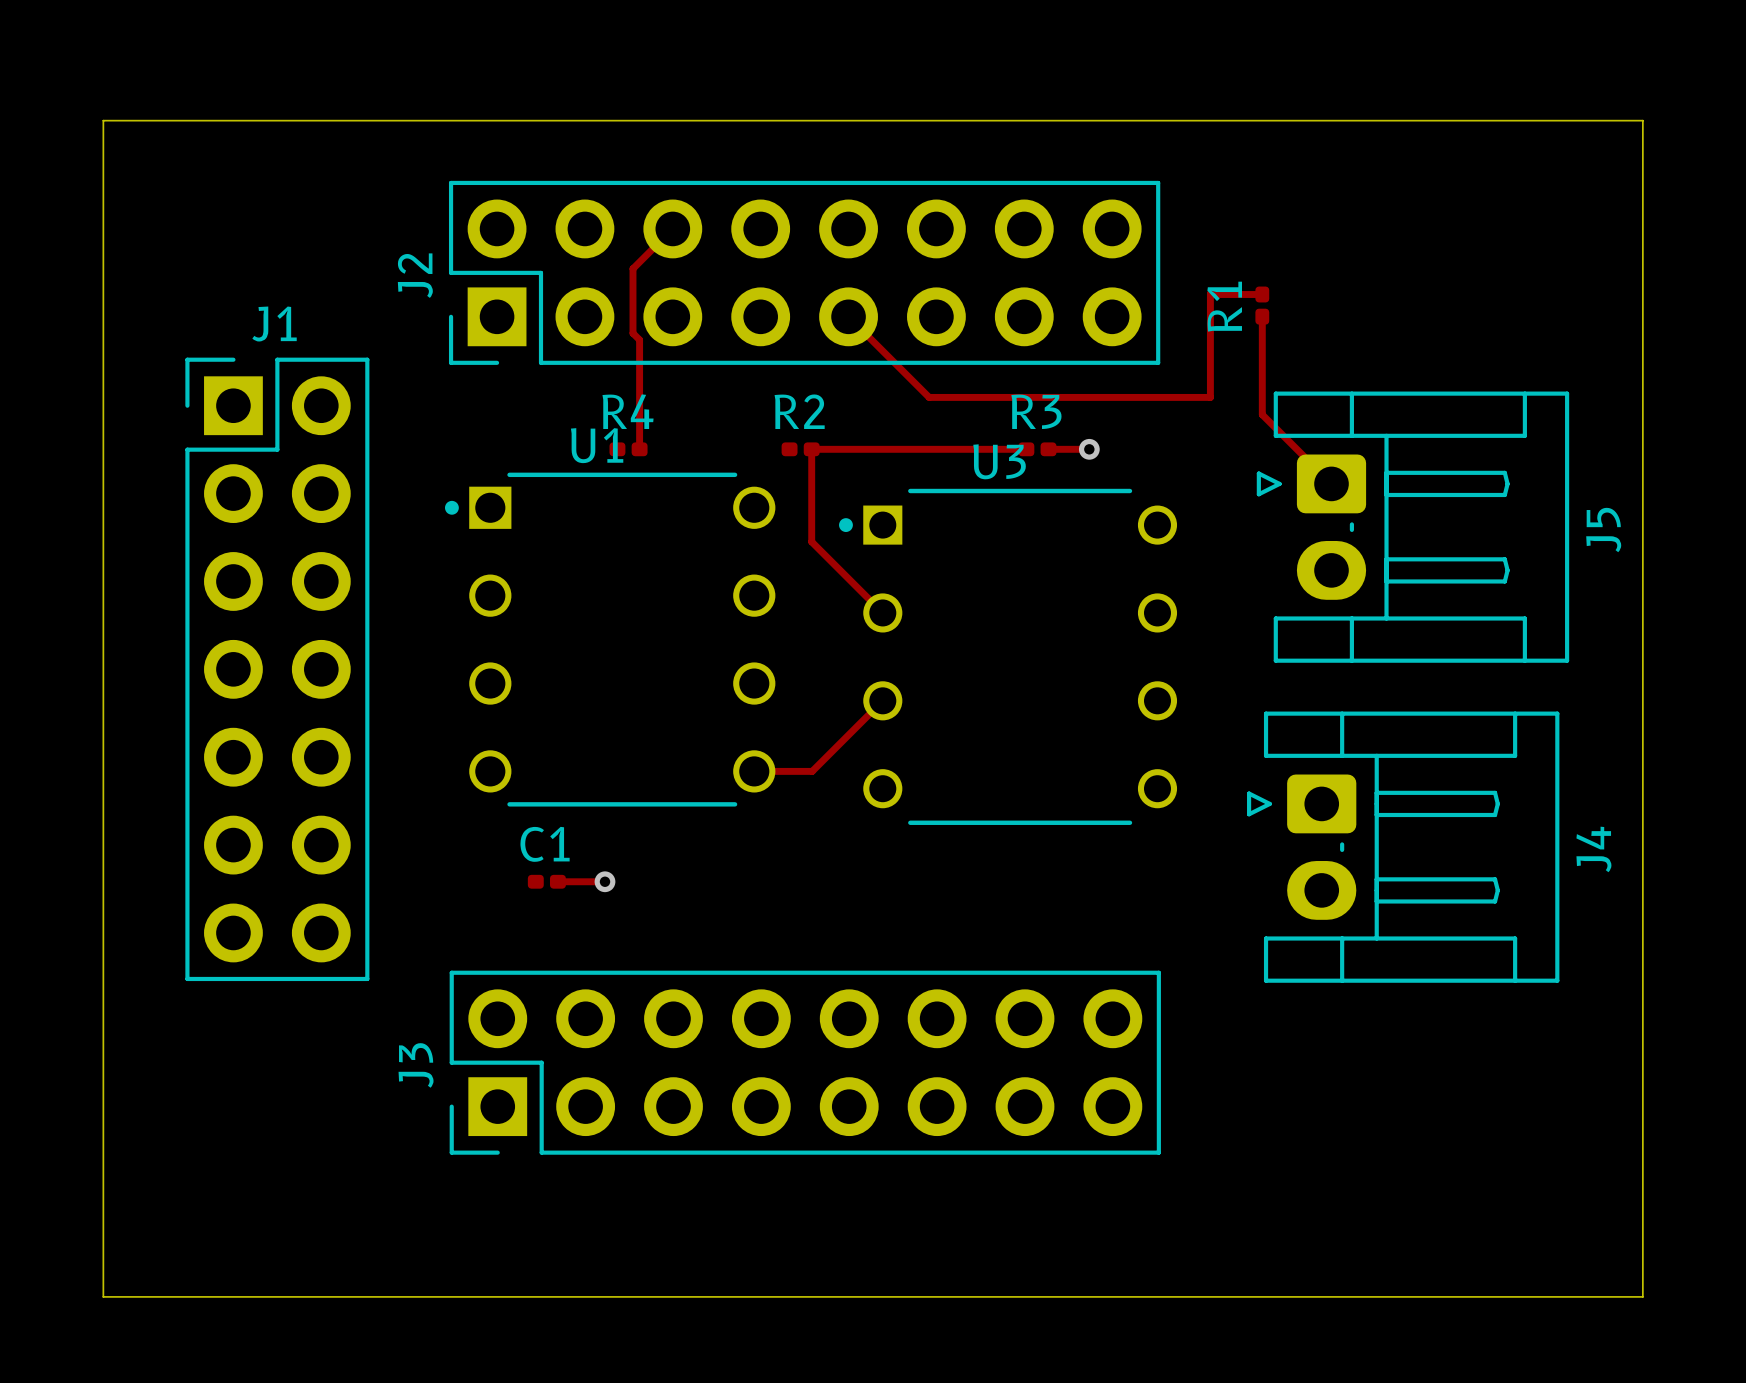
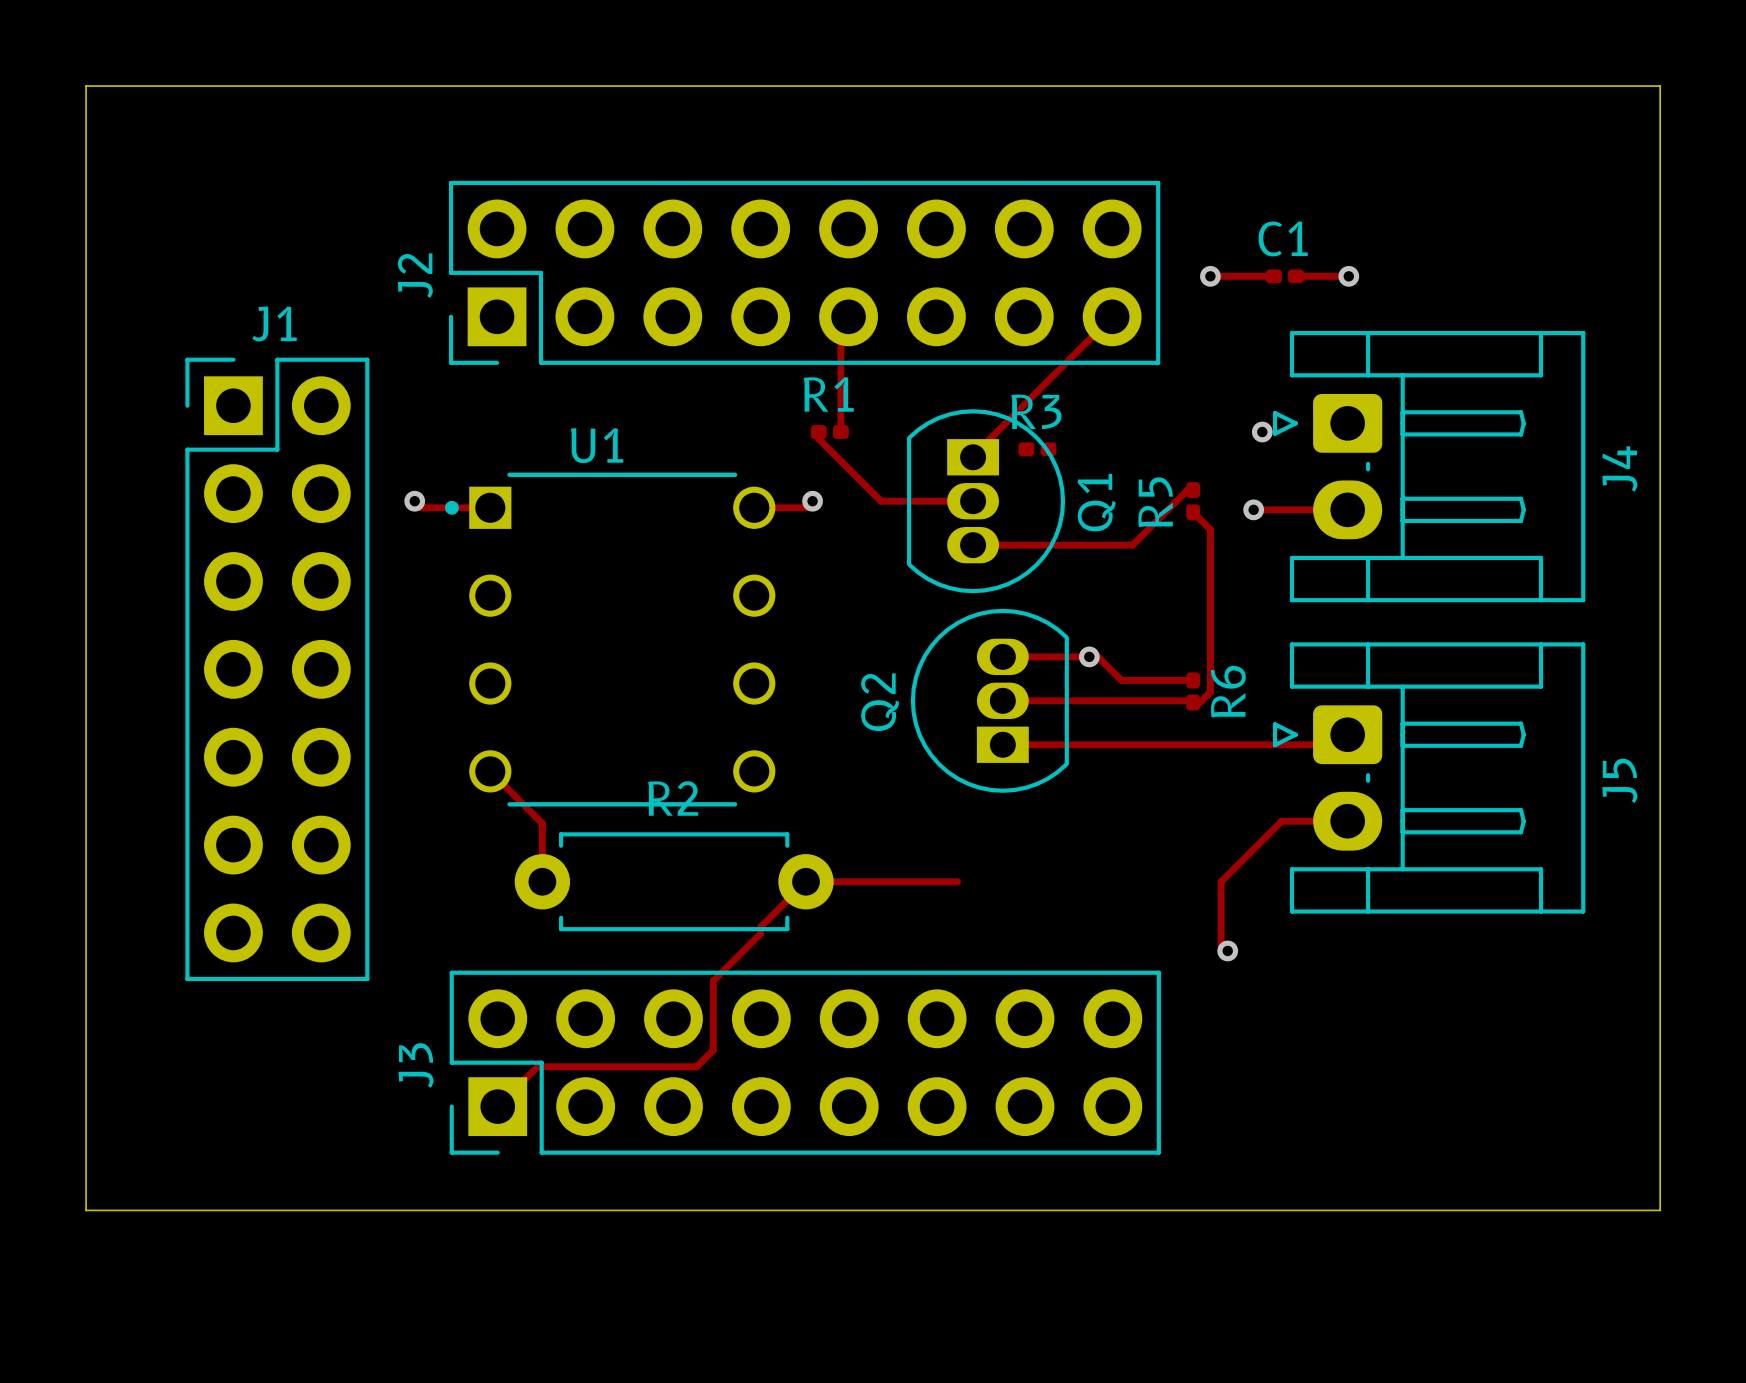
board edge: (103, 120) (1642, 120) (1642, 1296) (103, 1296) (103, 120) -> (86, 86) (86, 1210) (1660, 1210) (1660, 86) (86, 86)
top track: (672, 228) (632, 268) (632, 333) (639, 339) (639, 449) -> none
top track: none -> (1210, 276) (1273, 276)
via: none -> (1210, 276)
top track: none -> (1296, 276) (1348, 276)
via: none -> (1348, 276)
top track: (1262, 294) (1210, 293) (1210, 397) (929, 397) (848, 316) -> (840, 432) (840, 324) (848, 316)
R1 rotation: 0° (1262, 305) -> 90° clockwise (829, 432)
R1 position: (1262, 305) -> (829, 432)
top track: none -> (1112, 316) (973, 457)
top track: (1262, 316) (1262, 414) (1331, 483) -> none
top track: none -> (818, 432) (818, 438) (881, 501) (973, 501)
via: none -> (1262, 432)
R2 footprint: [781, 442, 820, 457] -> [514, 832, 834, 932]
R4: (628, 449) -> none
top track: (1026, 449) (811, 449) (811, 541) (882, 612) -> none
top track: (1048, 449) (1089, 449) -> none
via: (1089, 449) -> none
top track: none -> (1193, 490) (1187, 490) (1132, 545) (973, 545)
top track: none -> (414, 501) (421, 507) (490, 507)
via: none -> (414, 501)
top track: none -> (812, 501) (806, 507) (754, 507)
via: none -> (812, 501)
Q1: none -> (986, 501)
R5: none -> (1193, 501)
top track: none -> (1253, 509) (1347, 509)
via: none -> (1253, 509)
top track: none -> (1193, 512) (1210, 529) (1210, 692) (1200, 702) (1191, 700) (1002, 700)
J5 position: (1412, 527) -> (1429, 777)
top track: none -> (1002, 656) (1097, 656) (1121, 680) (1193, 680)
U3: (1008, 656) -> none
via: none -> (1089, 656)
R6: none -> (1193, 691)
top track: (882, 700) (812, 771) (754, 771) -> none
Q2: none -> (989, 700)
top track: none -> (1347, 734) (1337, 744) (1002, 744)
top track: none -> (490, 771) (542, 823) (542, 881)
top track: none -> (1347, 821) (1281, 821) (1221, 881) (1221, 944) (1227, 950)
J4 position: (1403, 847) -> (1429, 466)
C1 position: (546, 881) -> (1284, 276)
top track: (557, 881) (605, 881) -> none
via: (605, 881) -> none
top track: none -> (957, 881) (806, 881) (760, 927) (760, 933) (713, 981) (713, 1050) (696, 1066) (537, 1066) (497, 1106)
via: none -> (1227, 950)

